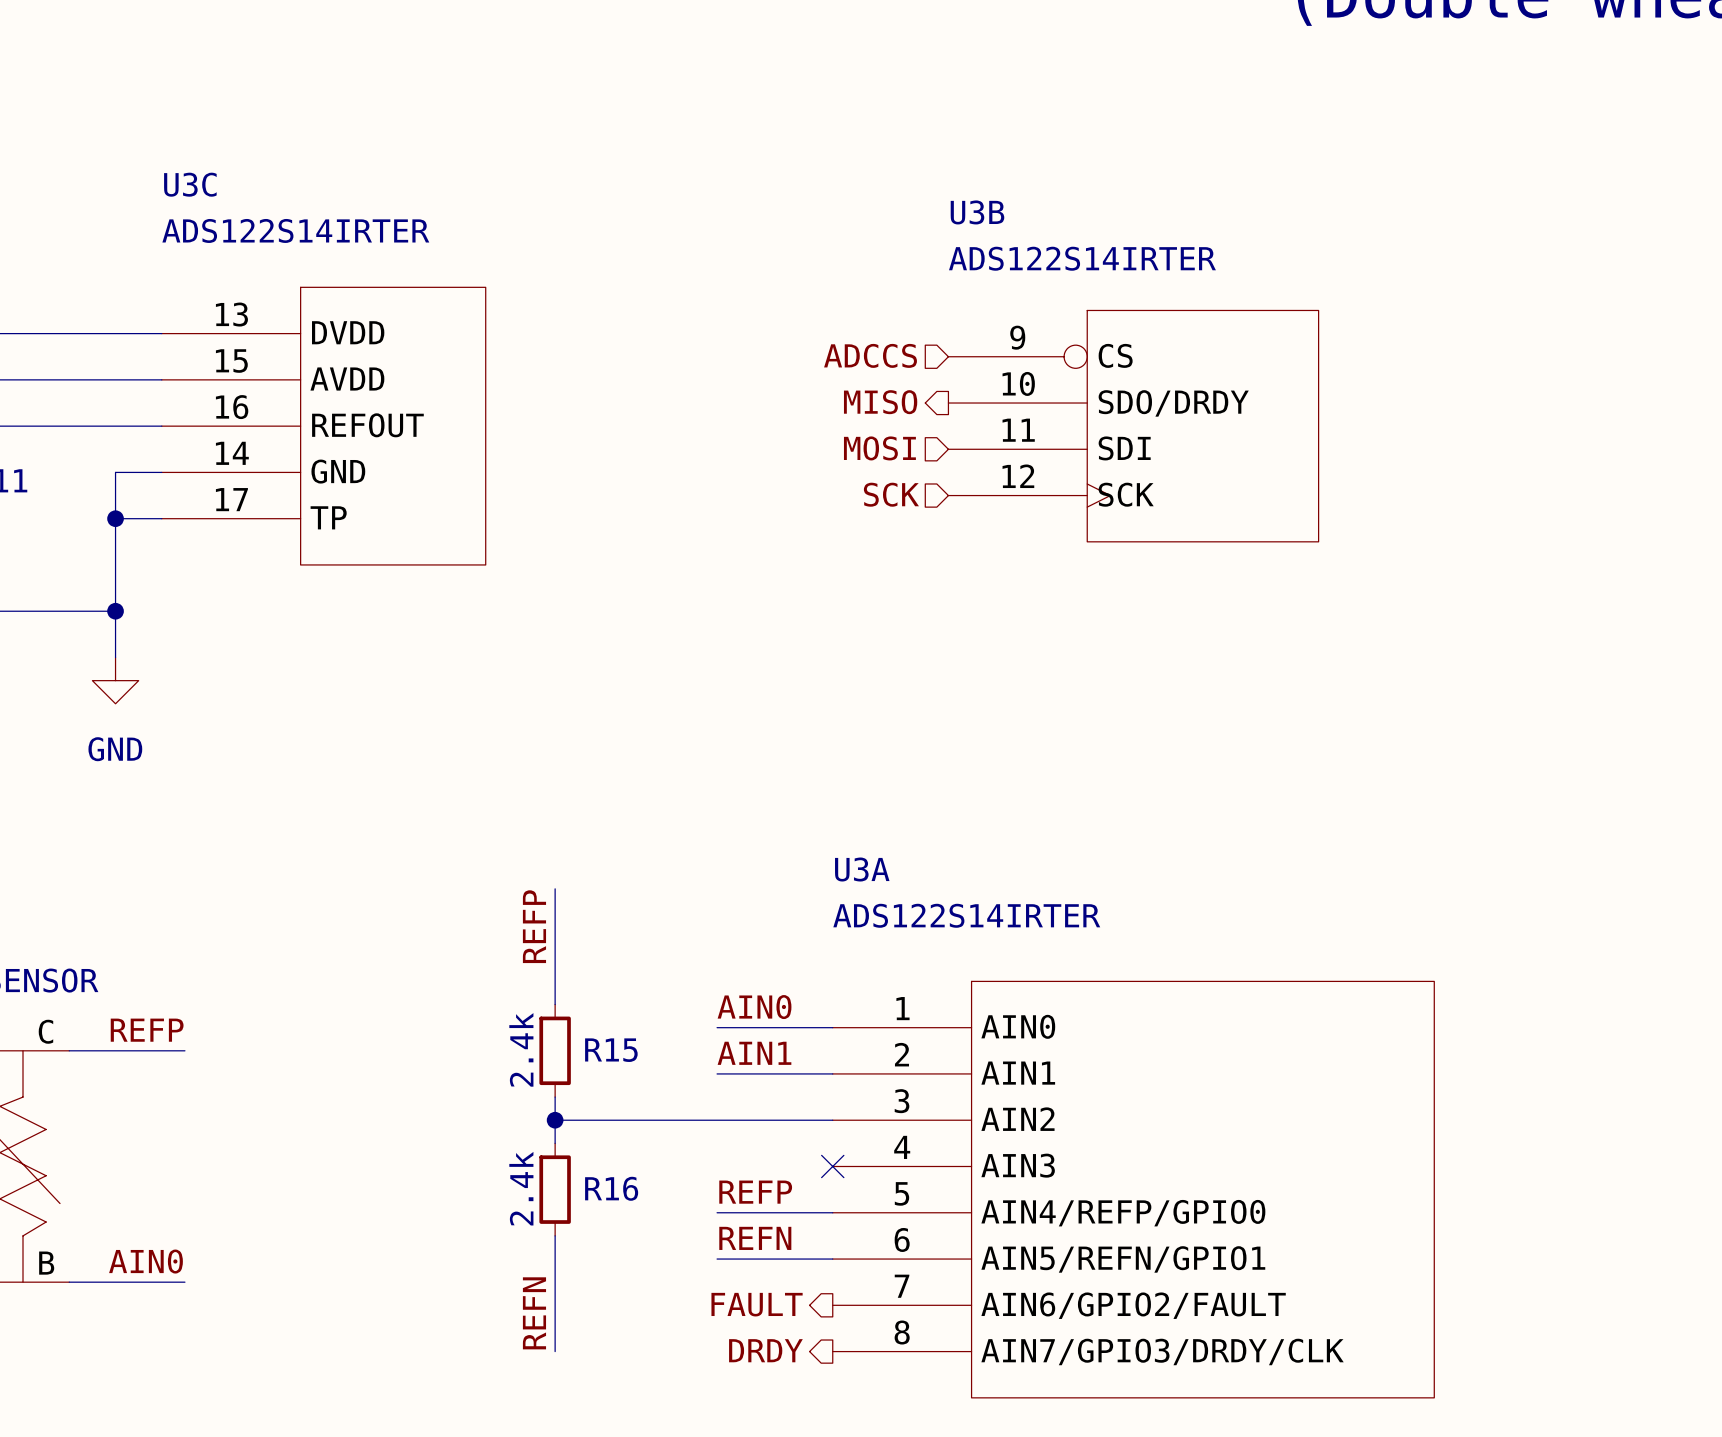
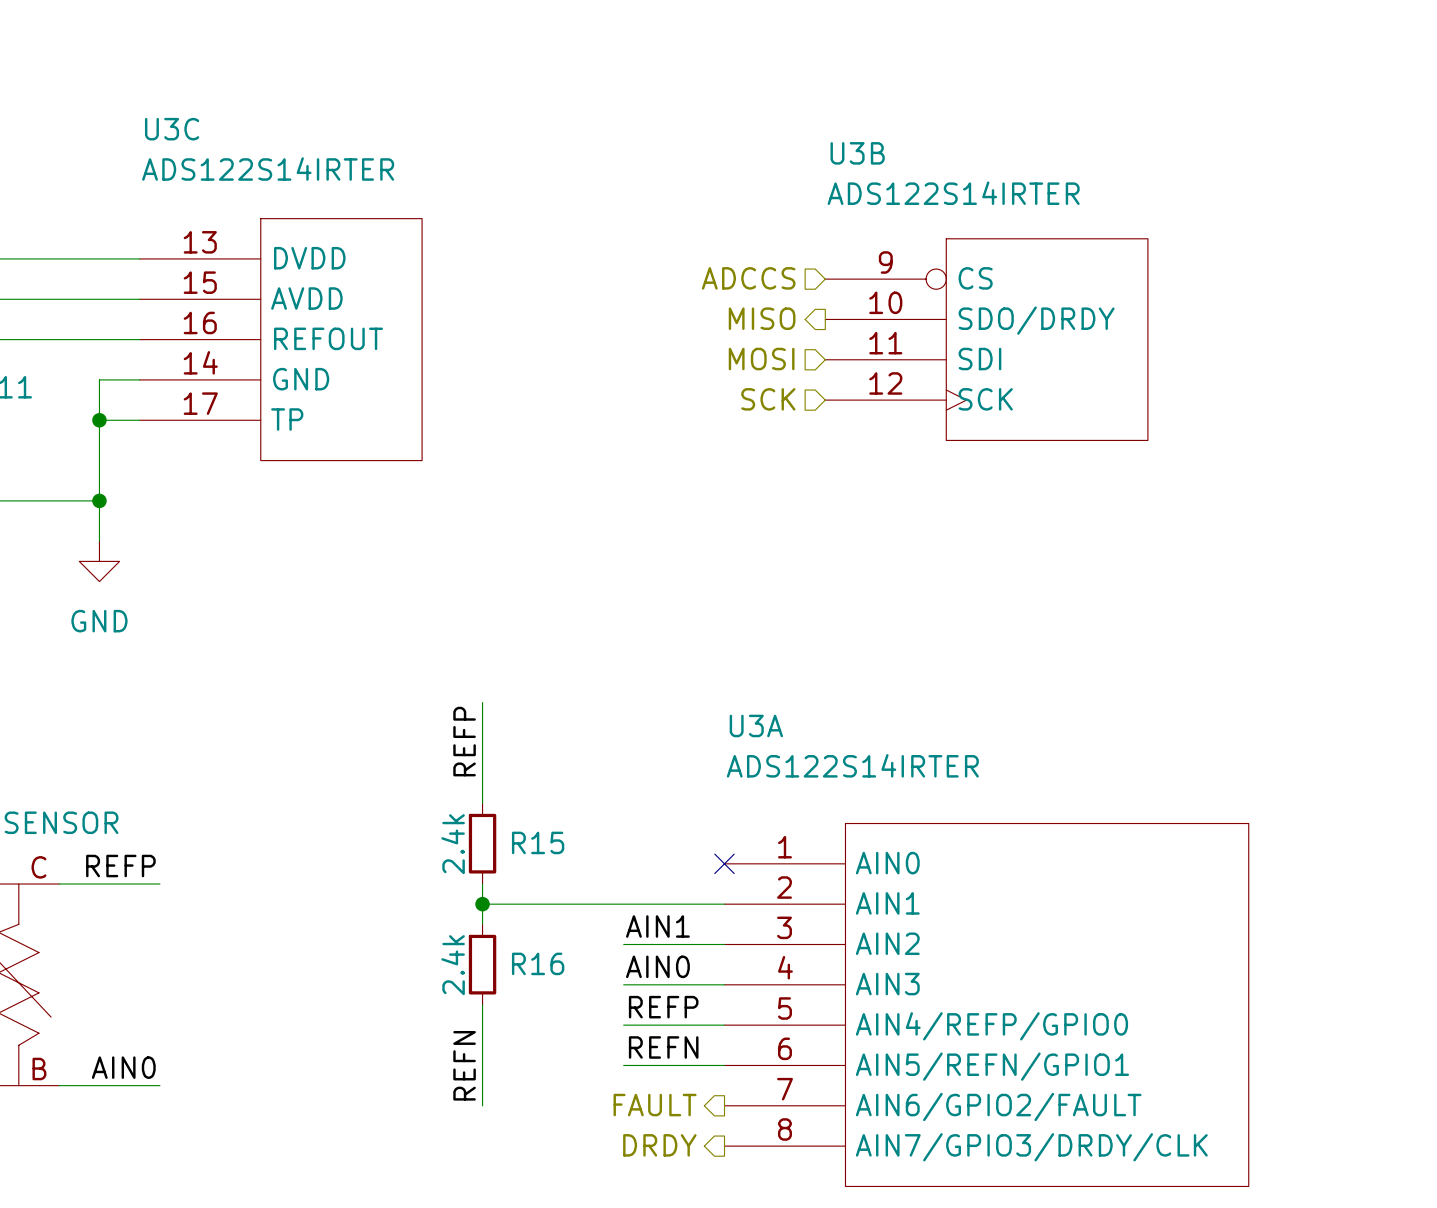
label position: REFP (534, 926) -> REFP (464, 741)
wire: (555, 958) (555, 1004) -> (482, 702) (482, 742)
label position: AIN0 (754, 1007) -> AIN0 (657, 966)
wire: (717, 1027) (832, 1027) -> (623, 984) (724, 984)
no-connect mark: none -> (724, 863)
R15 position: (555, 1050) -> (482, 843)
label position: AIN1 (754, 1053) -> AIN1 (657, 926)
wire: (555, 1097) (555, 1143) -> (482, 924) (482, 884)
wire: (555, 1120) (717, 1120) -> (482, 904) (623, 904)
junction position: (555, 1120) -> (482, 904)
no-connect mark: (832, 1166) -> none
R16 position: (555, 1189) -> (482, 964)
wire: (555, 1305) (555, 1351) -> (482, 1004) (482, 1045)
label position: REFN (534, 1313) -> REFN (464, 1065)

